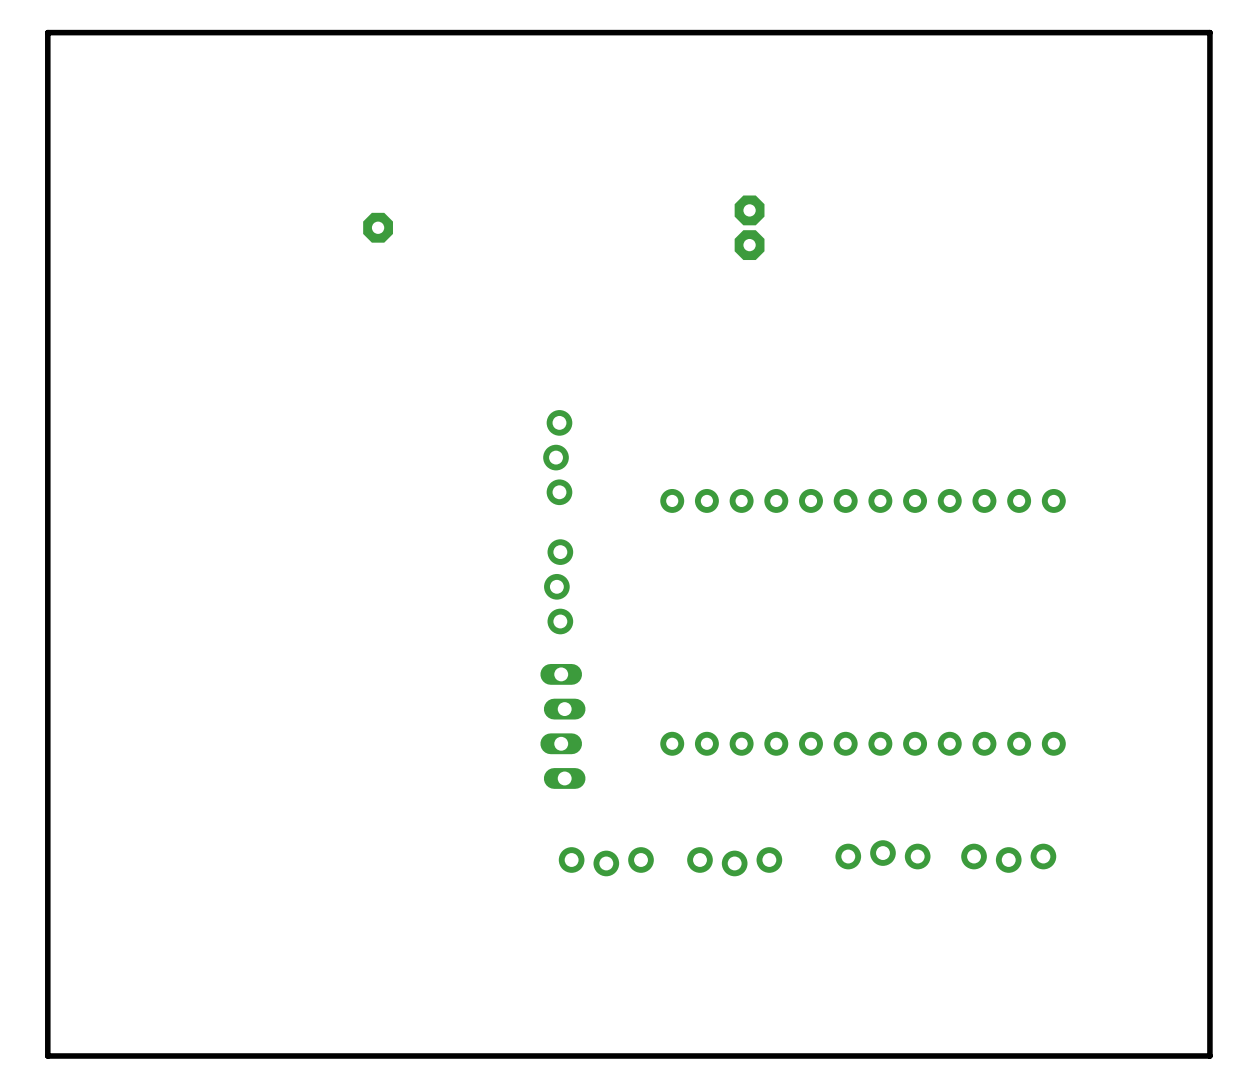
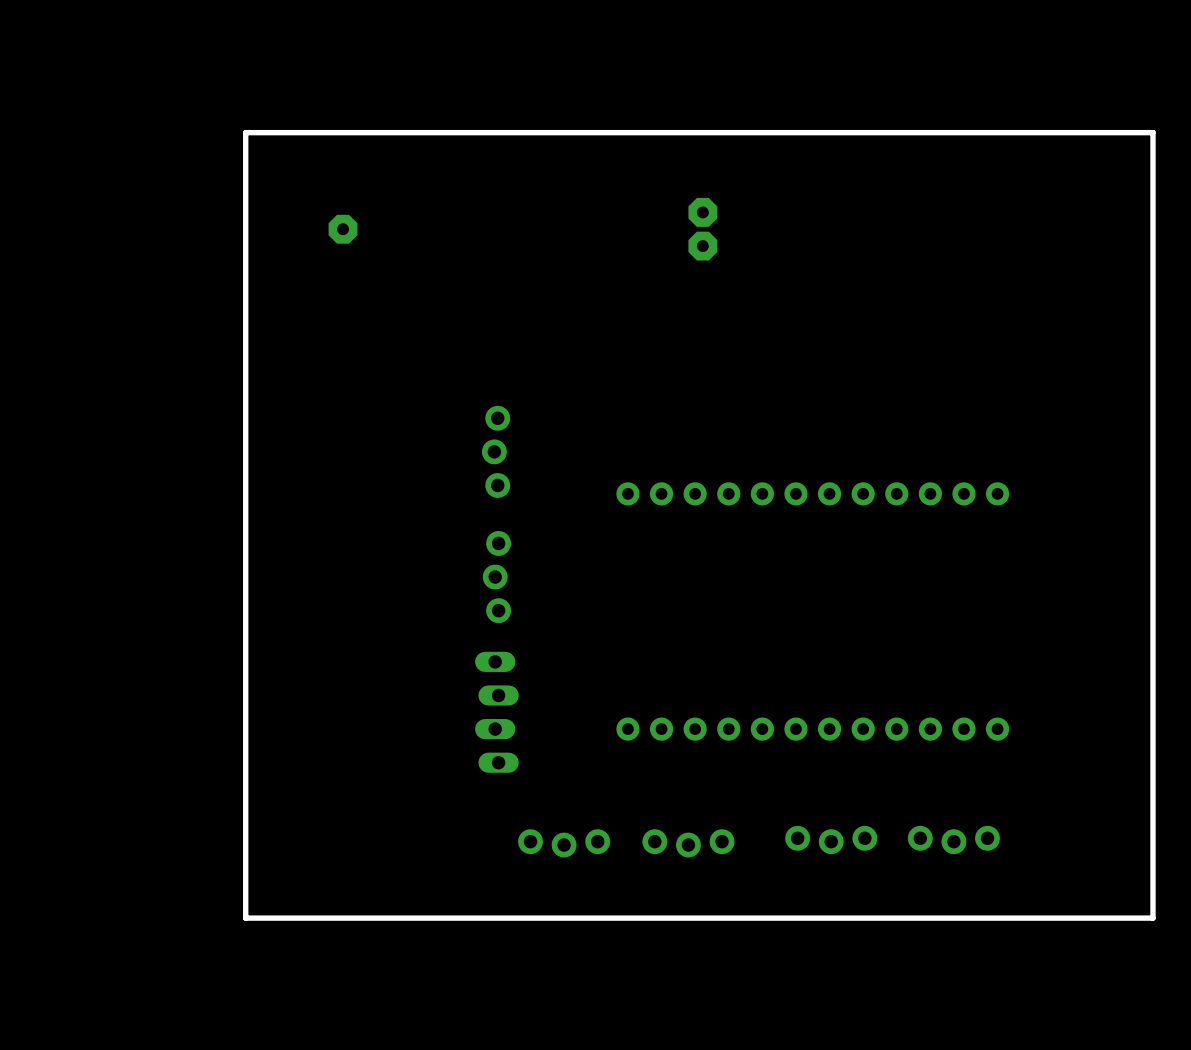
board edge: (1209, 32) (1209, 1055) (47, 1055) (47, 32) (1209, 32) -> (1152, 132) (1152, 918) (245, 918) (245, 132) (1152, 132)
part position: (557, 457) -> (496, 451)
part position: (558, 586) -> (496, 577)
part position: (562, 726) -> (496, 712)
part rotation: 0° (882, 854) -> 180° (831, 839)

